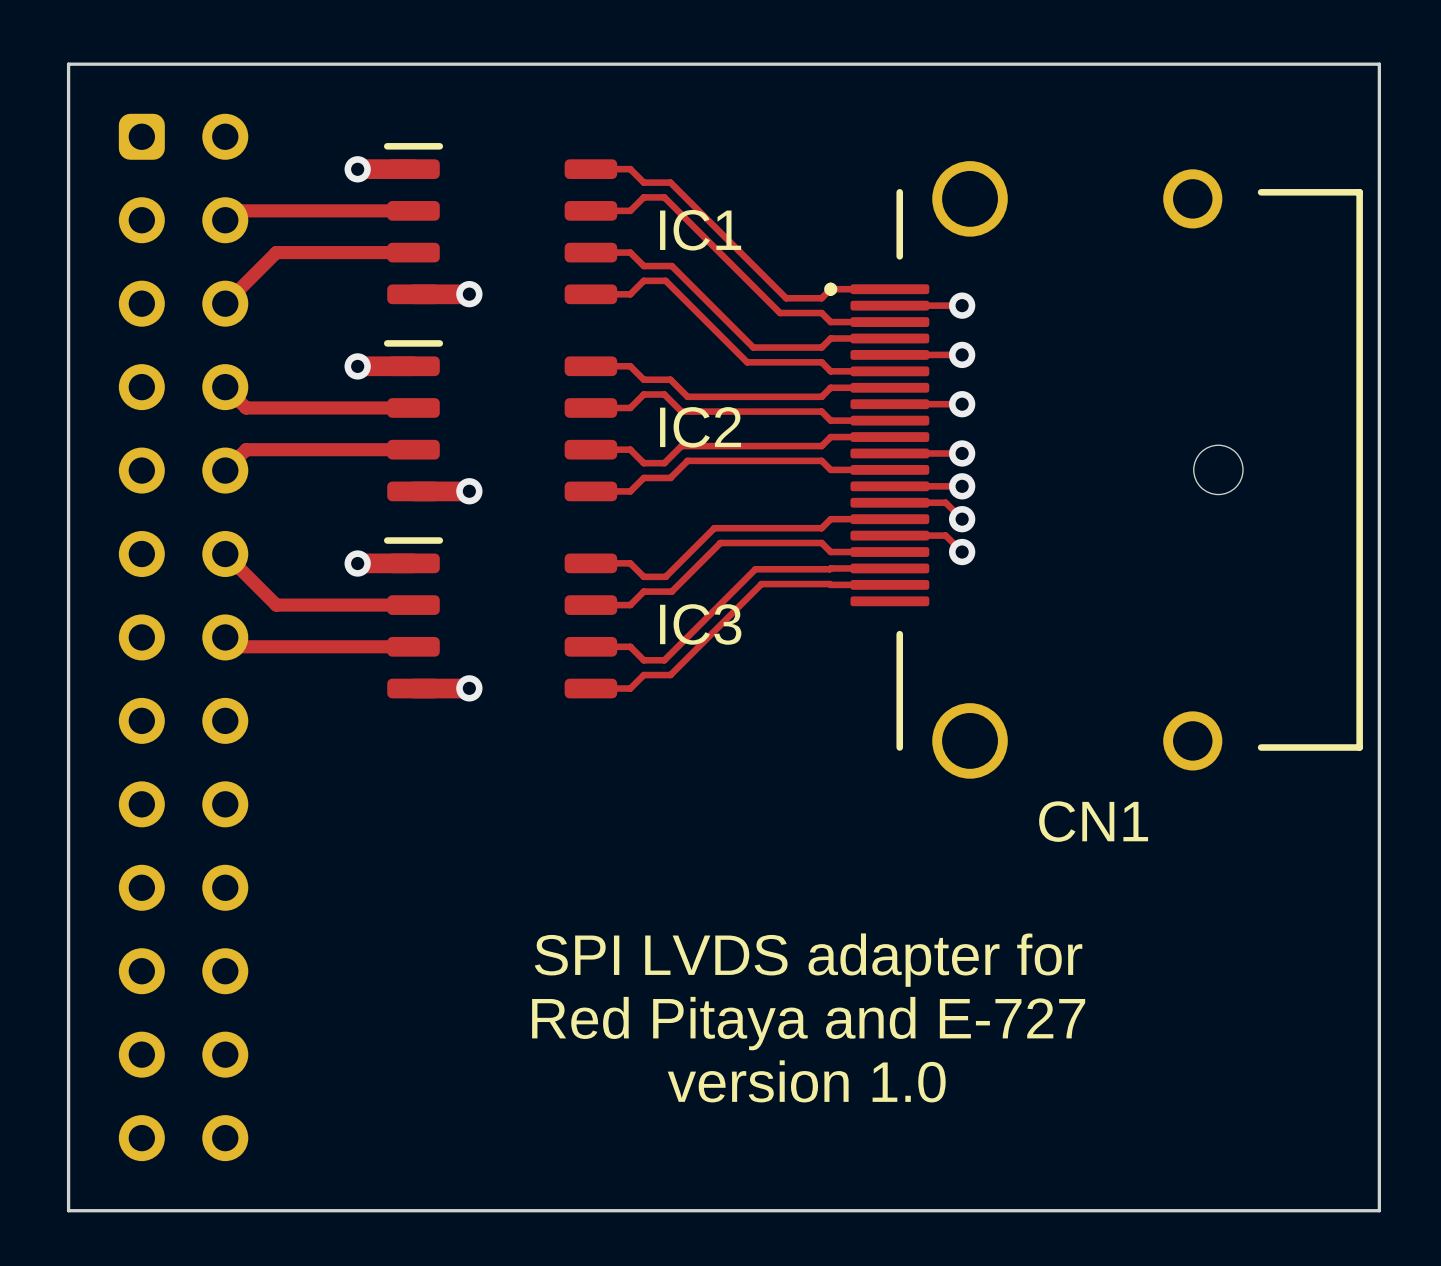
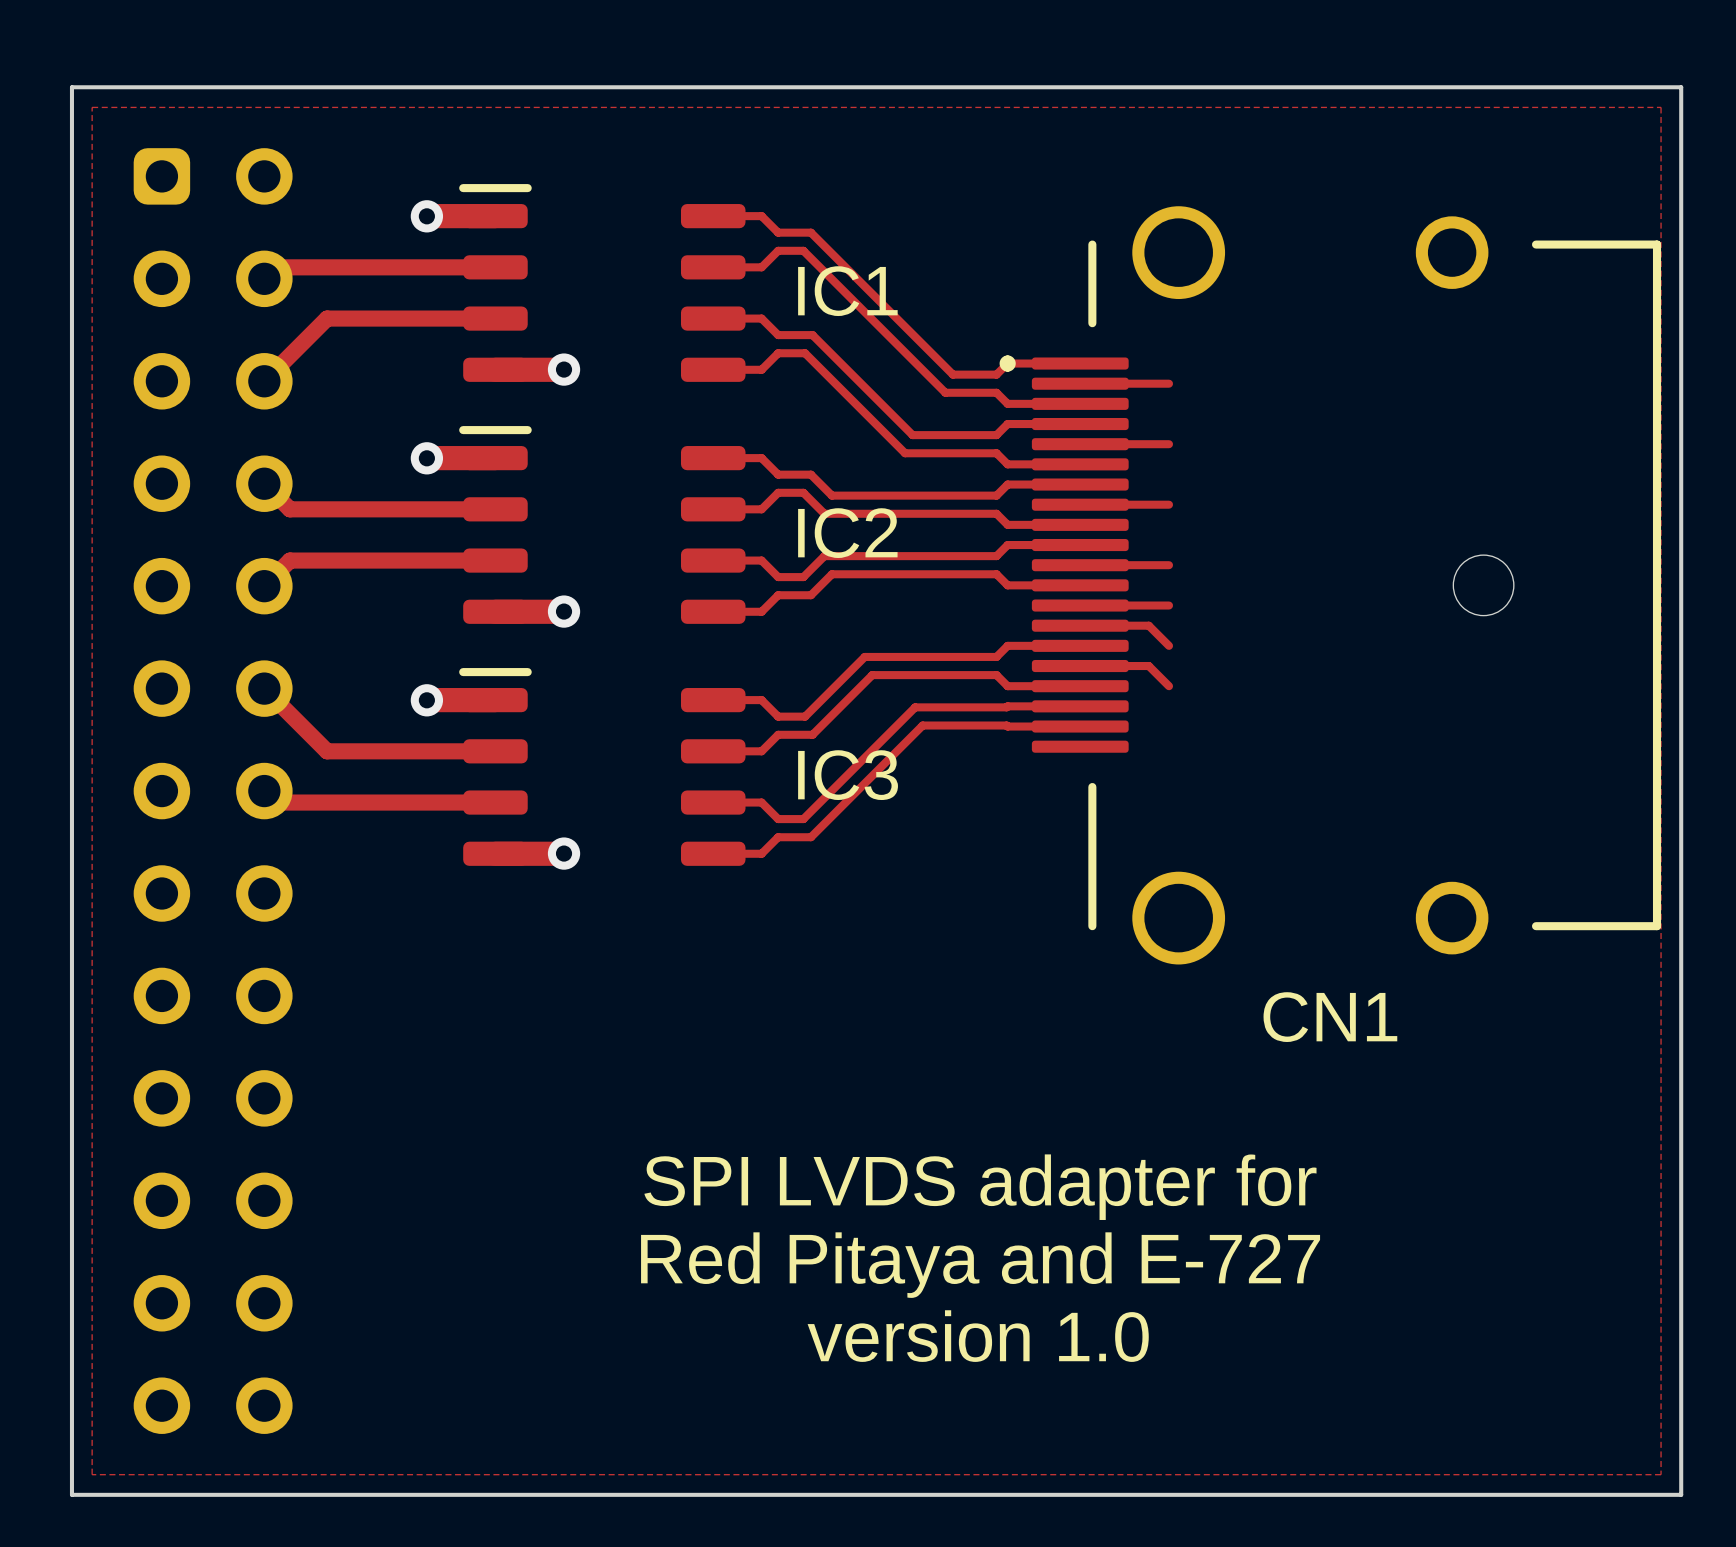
zone outline: none -> (92, 107) (92, 1474) (1661, 1474) (1661, 107) (92, 107)
via: (962, 305) -> none
via: (962, 354) -> none
via: (962, 404) -> none
via: (962, 453) -> none
via: (962, 486) -> none
via: (962, 519) -> none
via: (962, 552) -> none

